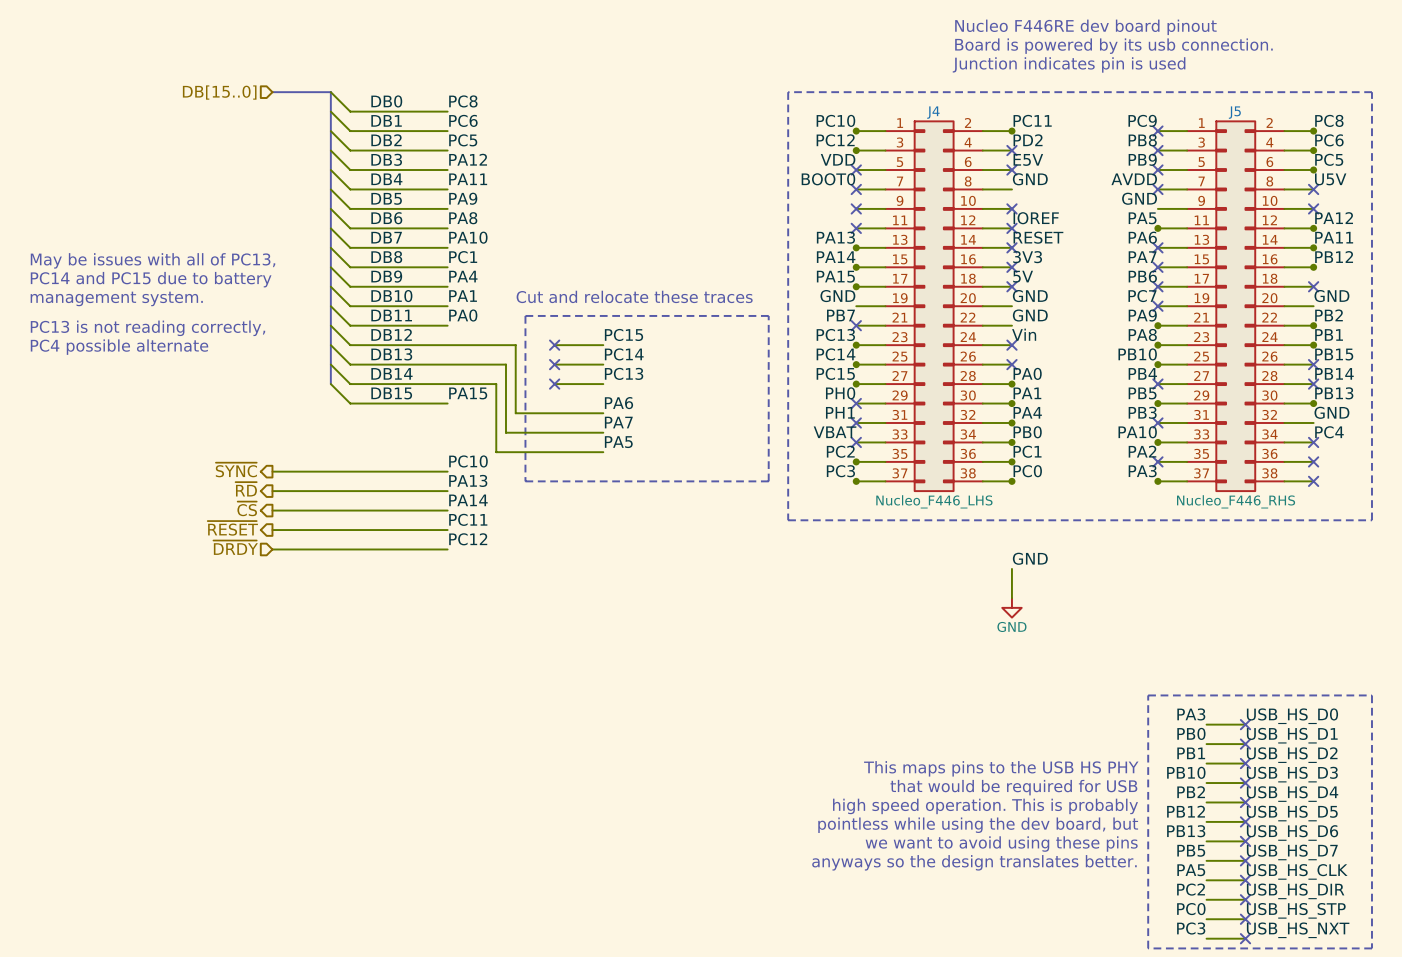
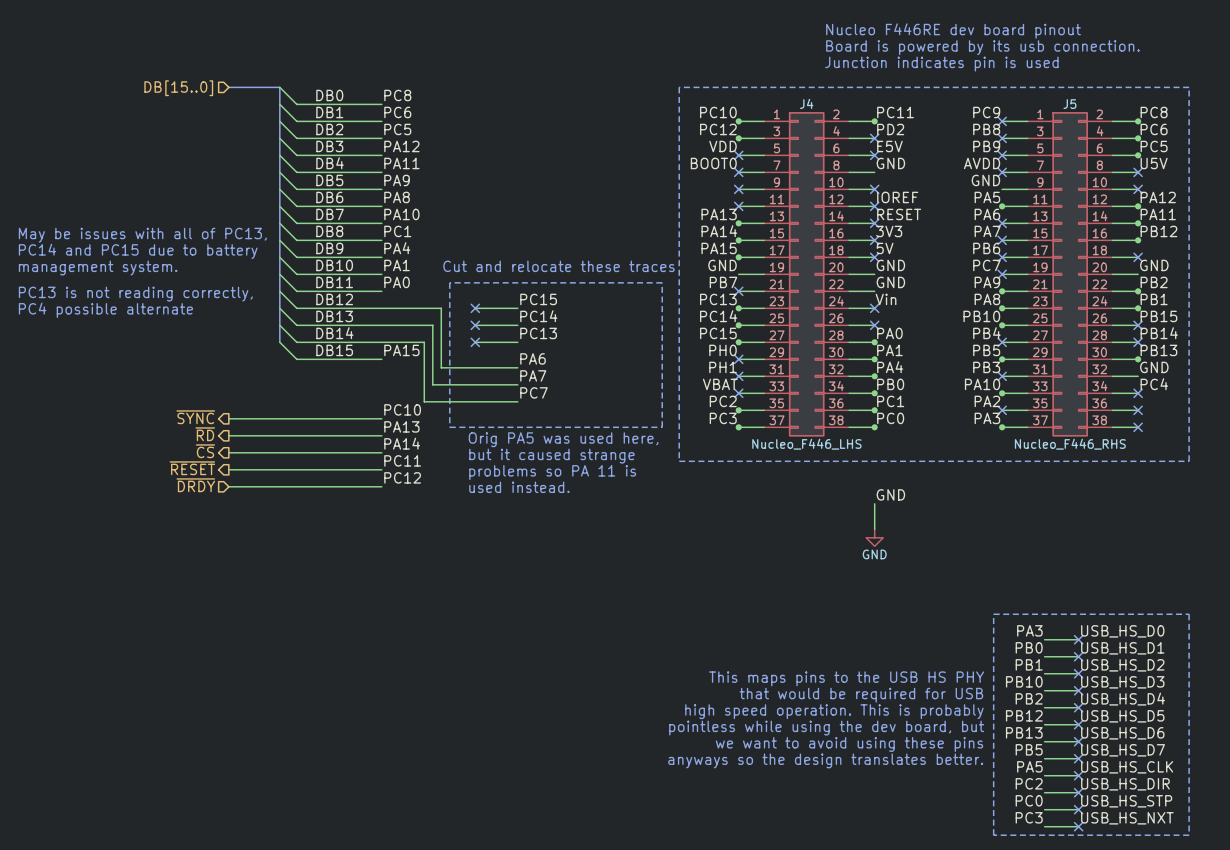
label: PA5 (618, 442) -> PC7 (533, 392)
text: none -> Orig PA5 was used here, (563, 439)
text: none -> but it caused strange (551, 456)
text: none -> problems so PA 11 is (552, 472)
text: none -> used instead. (519, 487)

